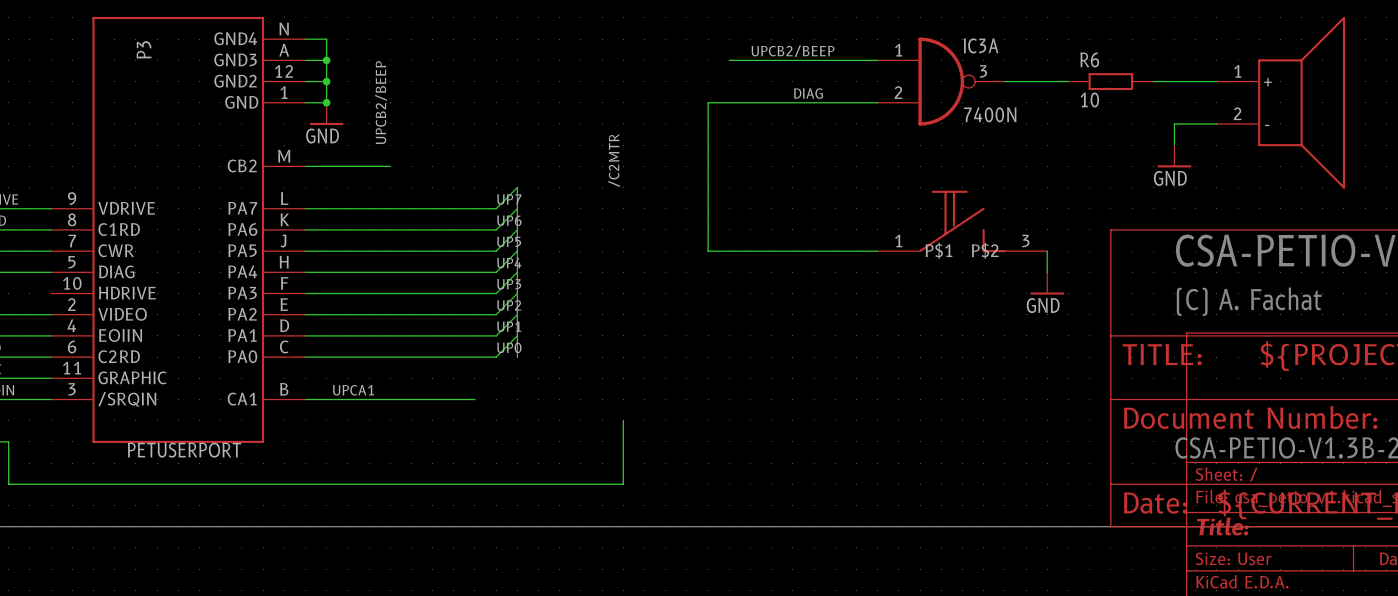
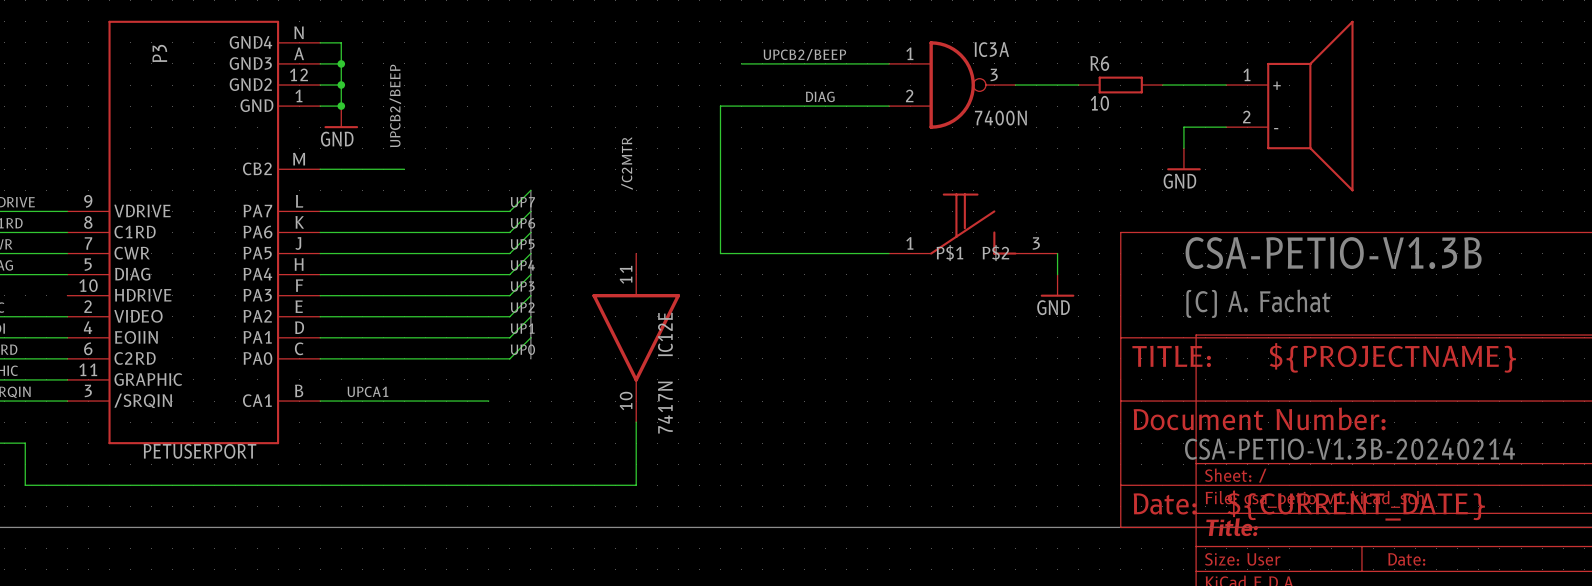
IC12E: none -> 7417N (636, 337)

